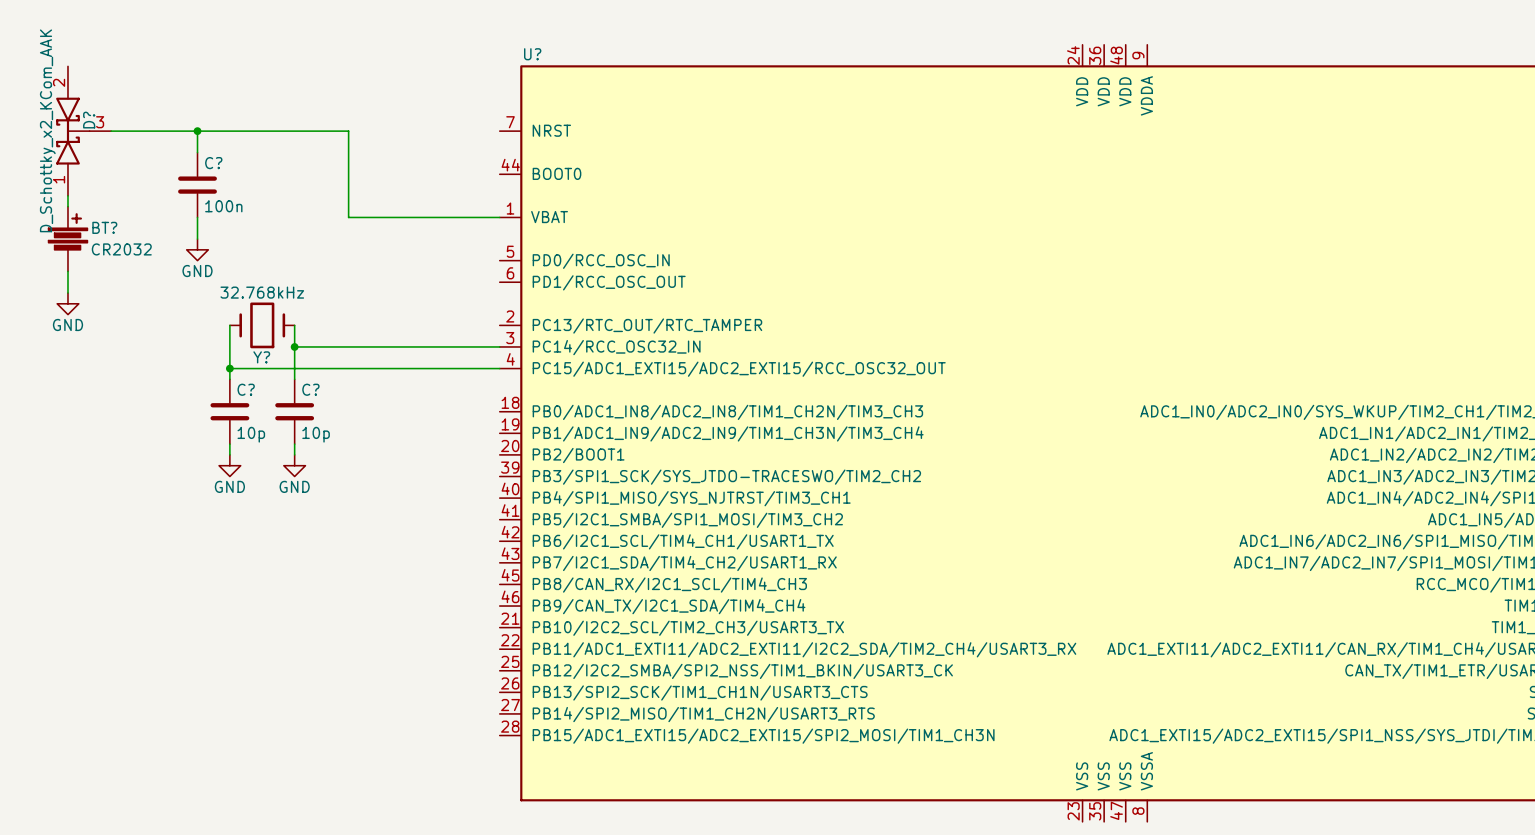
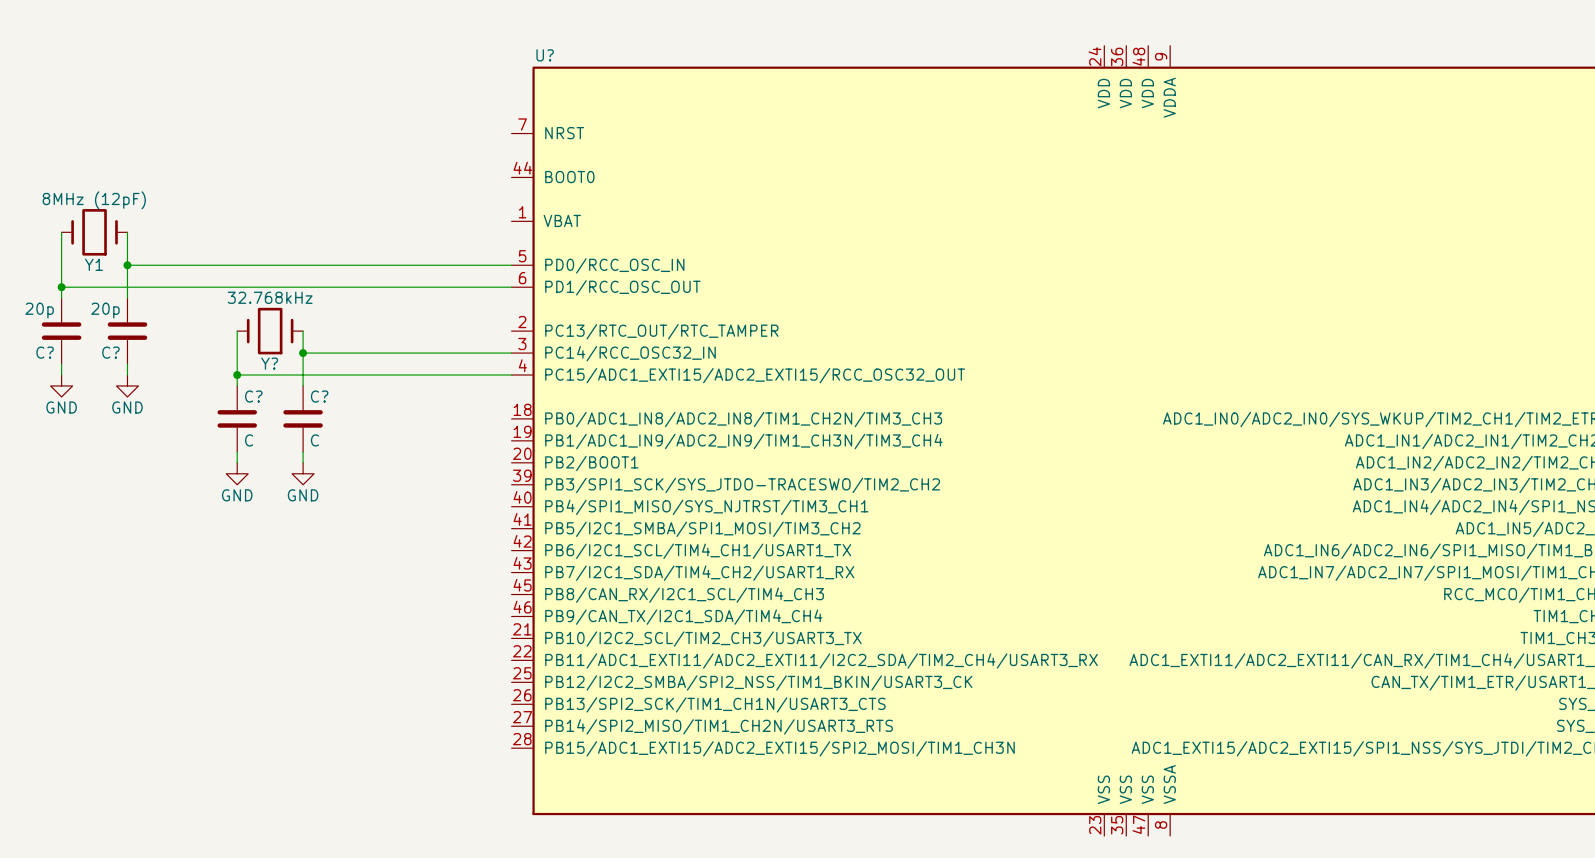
D?: D_Schottky_x2_KCom_AAK (83, 131) -> none
wire: (111, 131) (348, 131) (348, 217) (499, 217) -> none
wire: (197, 131) (197, 152) -> none
junction: (197, 131) -> none
C?: 100n (197, 185) -> none
wire: (67, 195) (67, 206) -> (61, 364) (61, 375)
wire: (197, 217) (197, 239) -> none
wire: none -> (61, 232) (61, 298)
Y1: none -> 8MHz (12pF) (94, 232)
wire: none -> (127, 232) (127, 298)
BT?: CR2032 (67, 239) -> none
power symbol: GND (197, 249) -> none
wire: none -> (127, 265) (511, 265)
junction: none -> (127, 265)
wire: (67, 271) (67, 293) -> none
wire: none -> (61, 287) (511, 287)
junction: none -> (61, 287)
power symbol: GND (67, 303) -> none
C?: none -> 20p (61, 331)
C?: none -> 20p (127, 331)
wire: none -> (127, 364) (127, 375)
power symbol: none -> GND (61, 385)
power symbol: none -> GND (127, 385)
C? value: 10p (251, 434) -> C (249, 440)
C? value: 10p (316, 434) -> C (314, 440)

